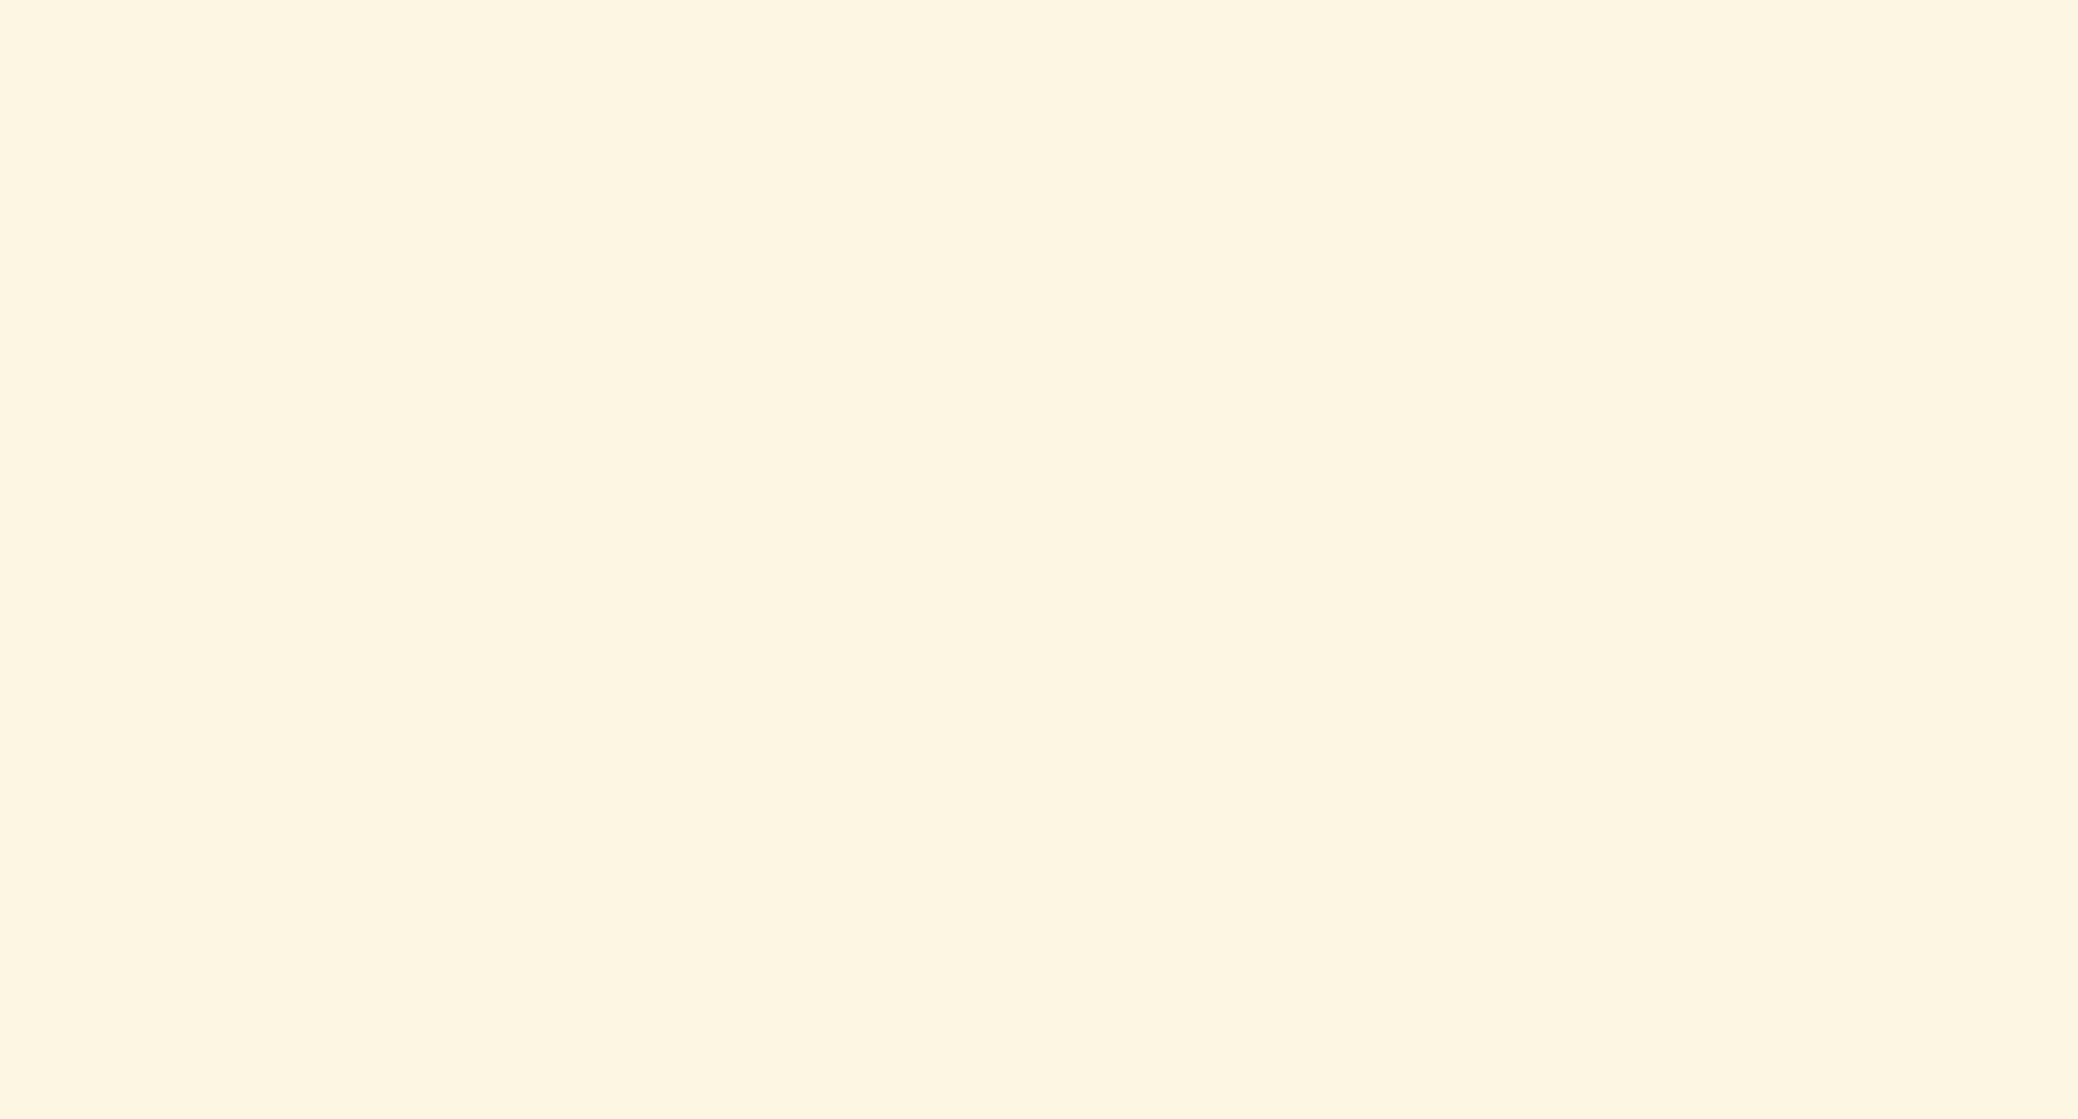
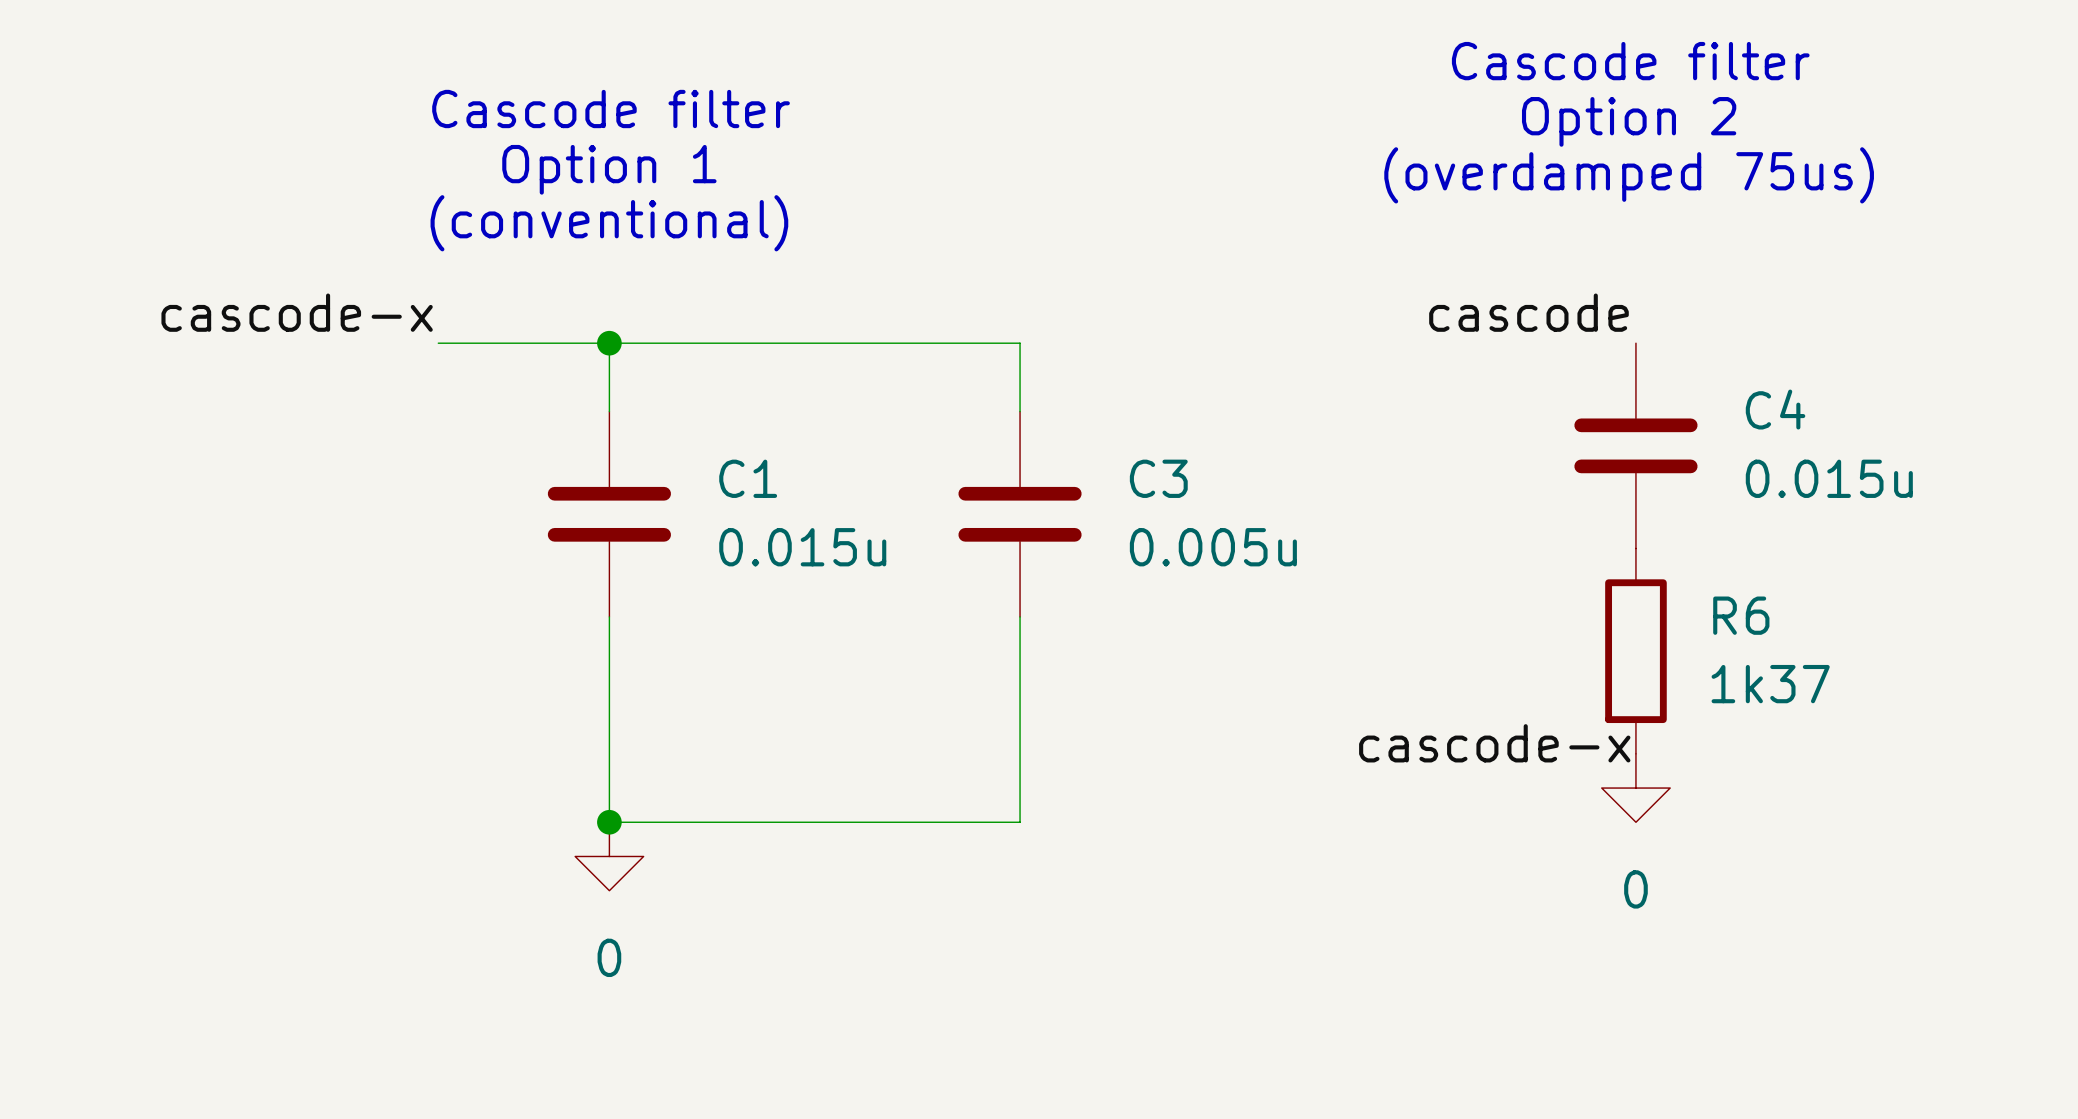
text: none -> Cascode filter (1630, 61)
text: none -> Cascode filter (611, 109)
text: none -> Option 2 (1629, 121)
text: none -> Option 1 (609, 169)
text: none -> (overdamped 75us) (1629, 175)
text: none -> (conventional) (609, 223)
label: none -> cascode-x (297, 312)
label: none -> cascode (1528, 312)
wire: none -> (438, 343) (1020, 343) (1020, 411)
wire: none -> (609, 343) (609, 411)
junction: none -> (609, 343)
C4: none -> 0.015u (1635, 445)
C1: none -> 0.015u (609, 514)
C3: none -> 0.005u (1020, 514)
wire: none -> (609, 616) (609, 822) (1020, 822) (1020, 616)
R6: none -> 1k37 (1635, 651)
label: none -> cascode-x (1494, 743)
power symbol: none -> 0 (1635, 788)
junction: none -> (609, 822)
power symbol: none -> 0 (609, 856)

